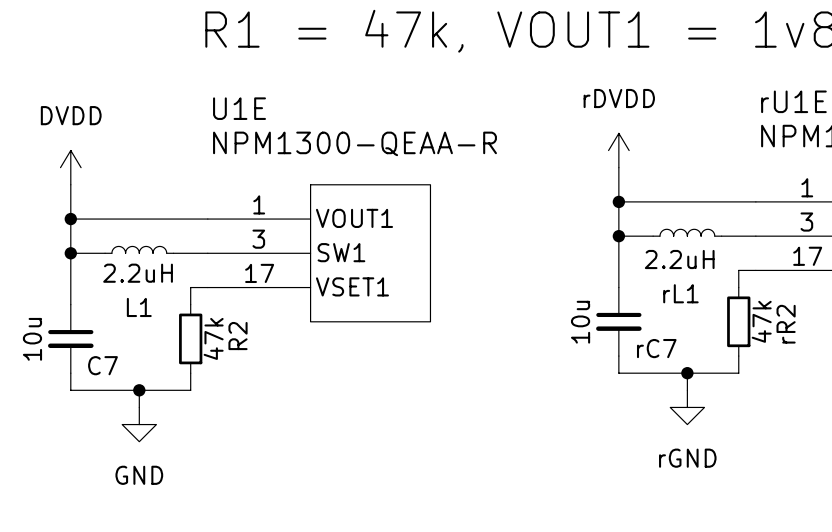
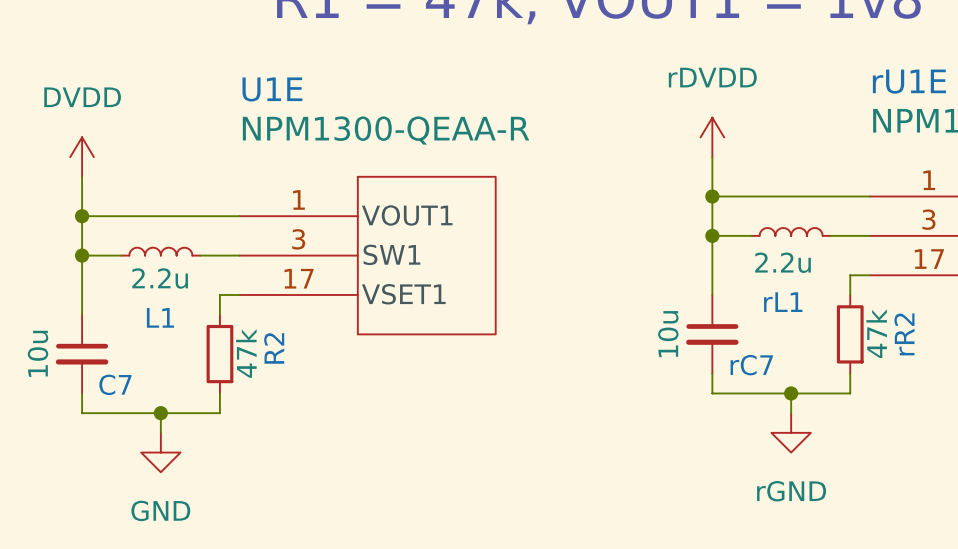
rL1 value: 2.2uH (679, 259) -> 2.2u (783, 262)
L1 value: 2.2uH (138, 273) -> 2.2u (160, 278)

